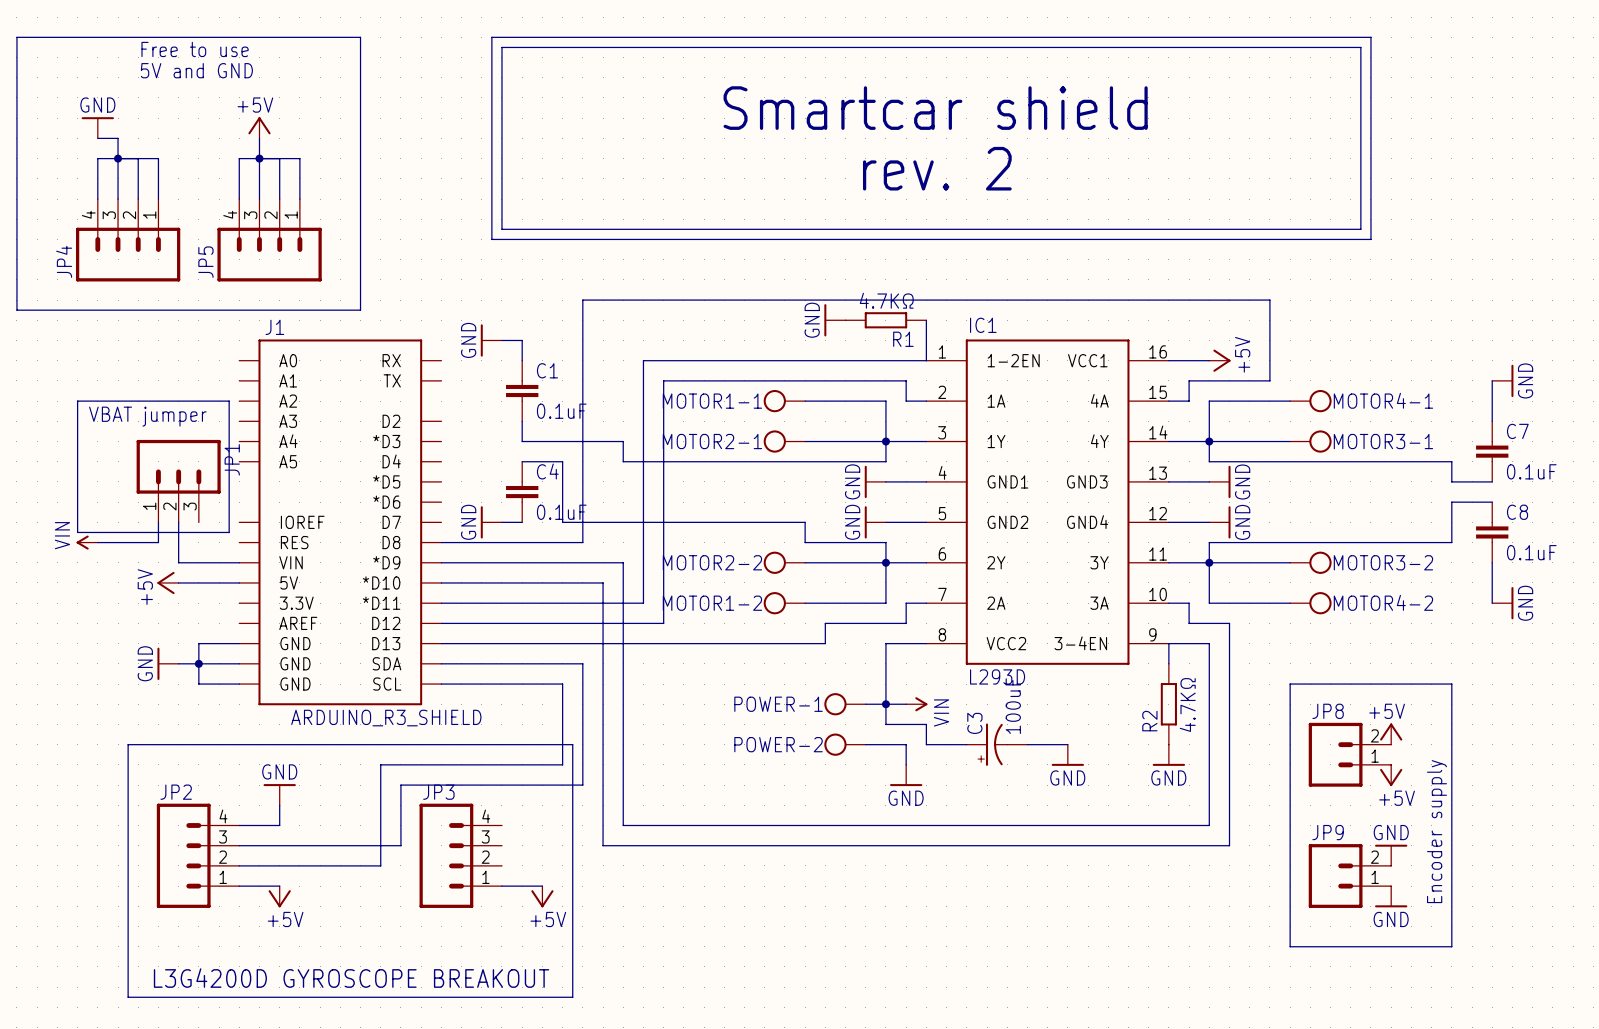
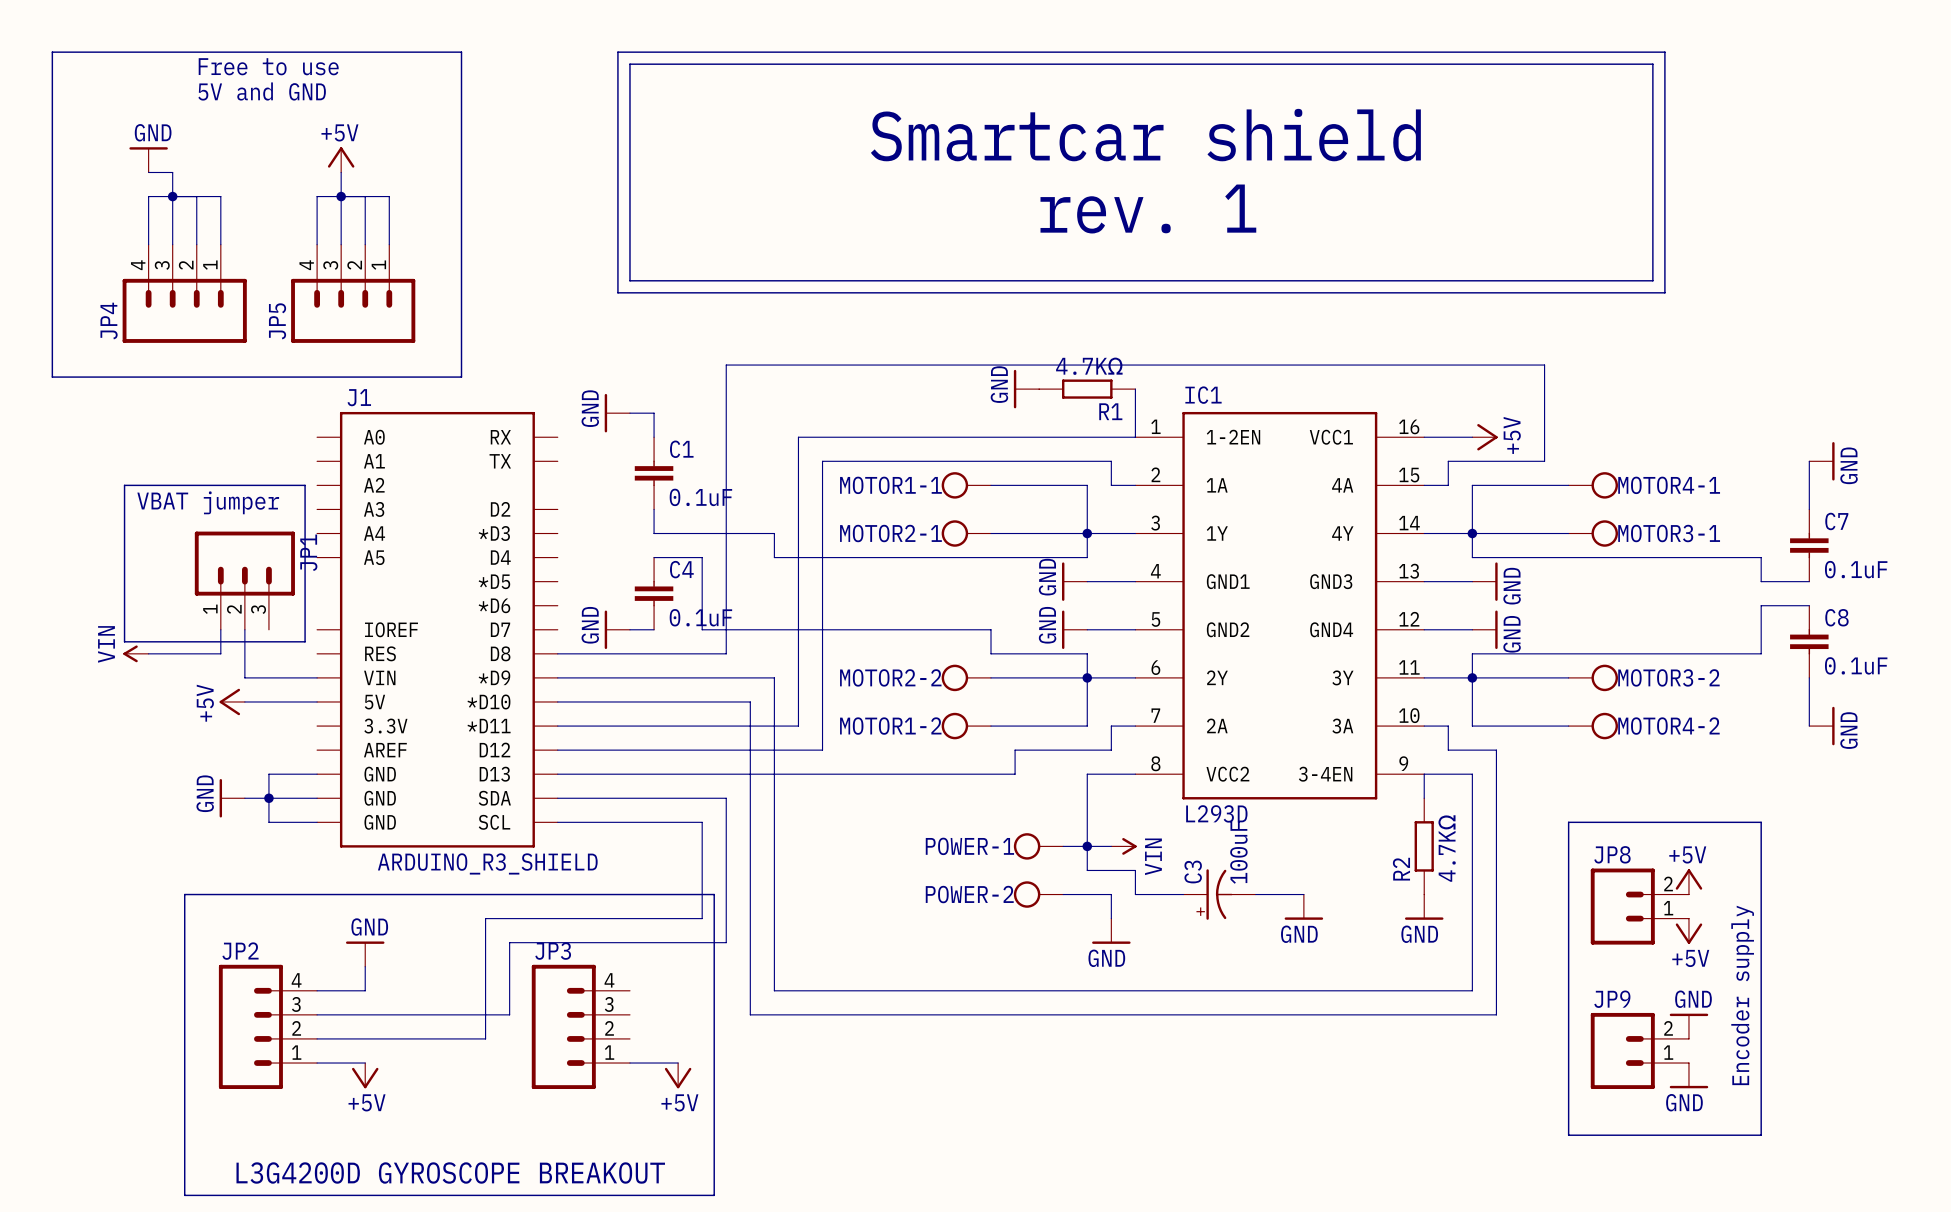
text: rev. 2 (937, 168) -> rev. 1 (1148, 209)

